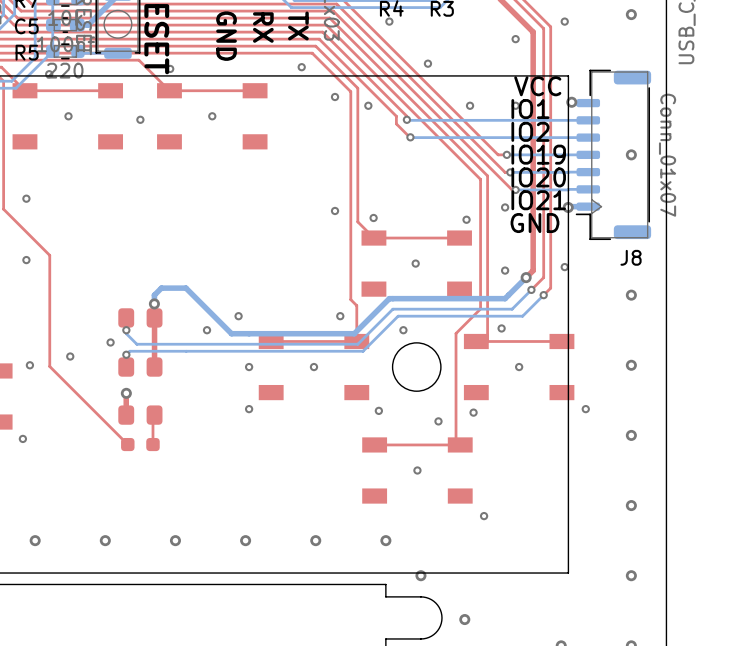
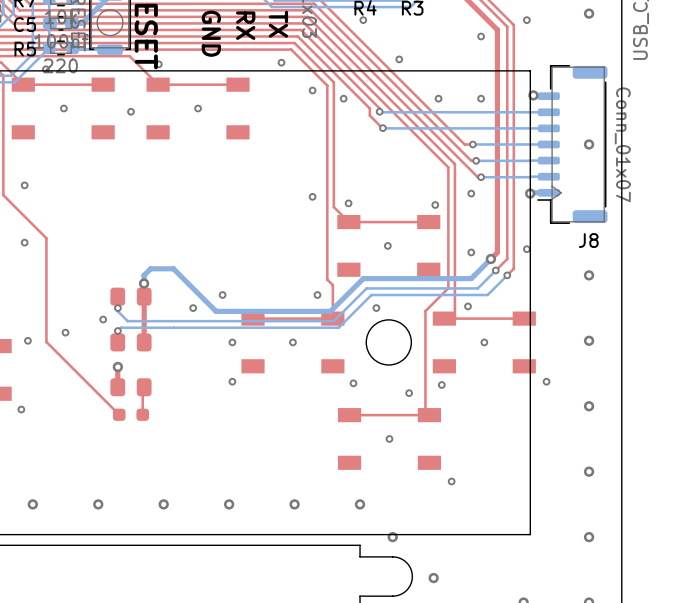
text: VCC (537, 86) -> none
text: IO1 (530, 109) -> none
text: IO2 (530, 131) -> none
text: IO19 (538, 154) -> none
text: IO20 (538, 177) -> none
text: IO21 (538, 200) -> none
text: GND (534, 223) -> none

